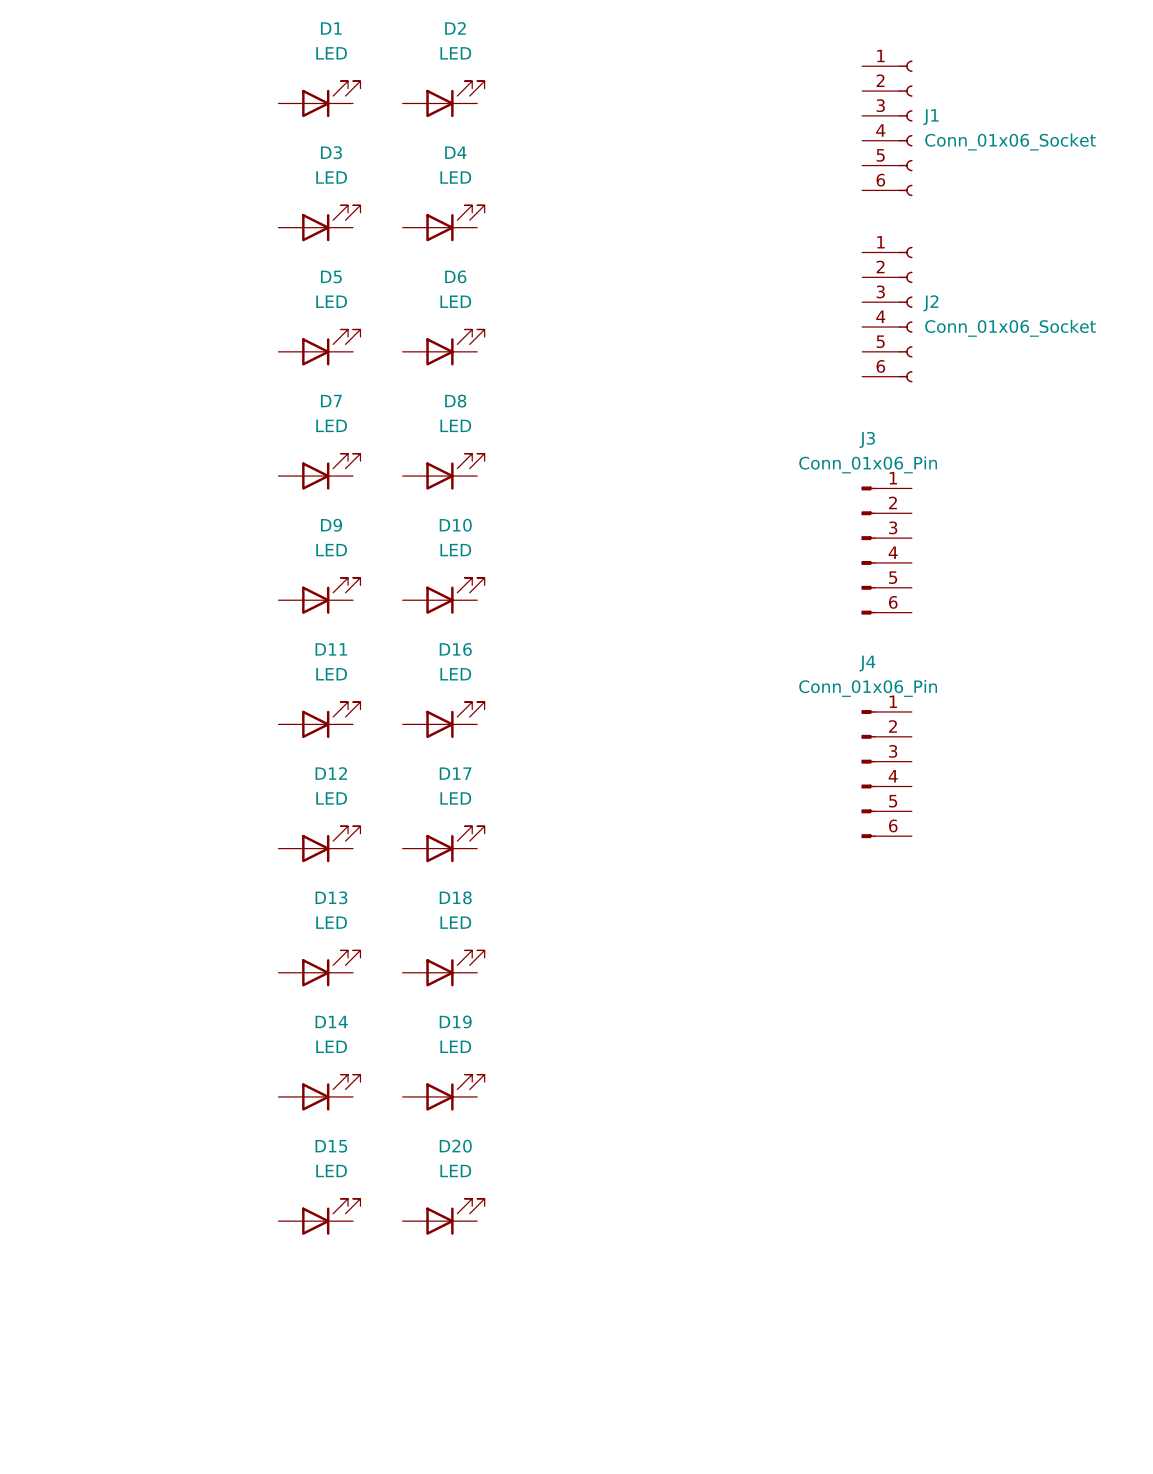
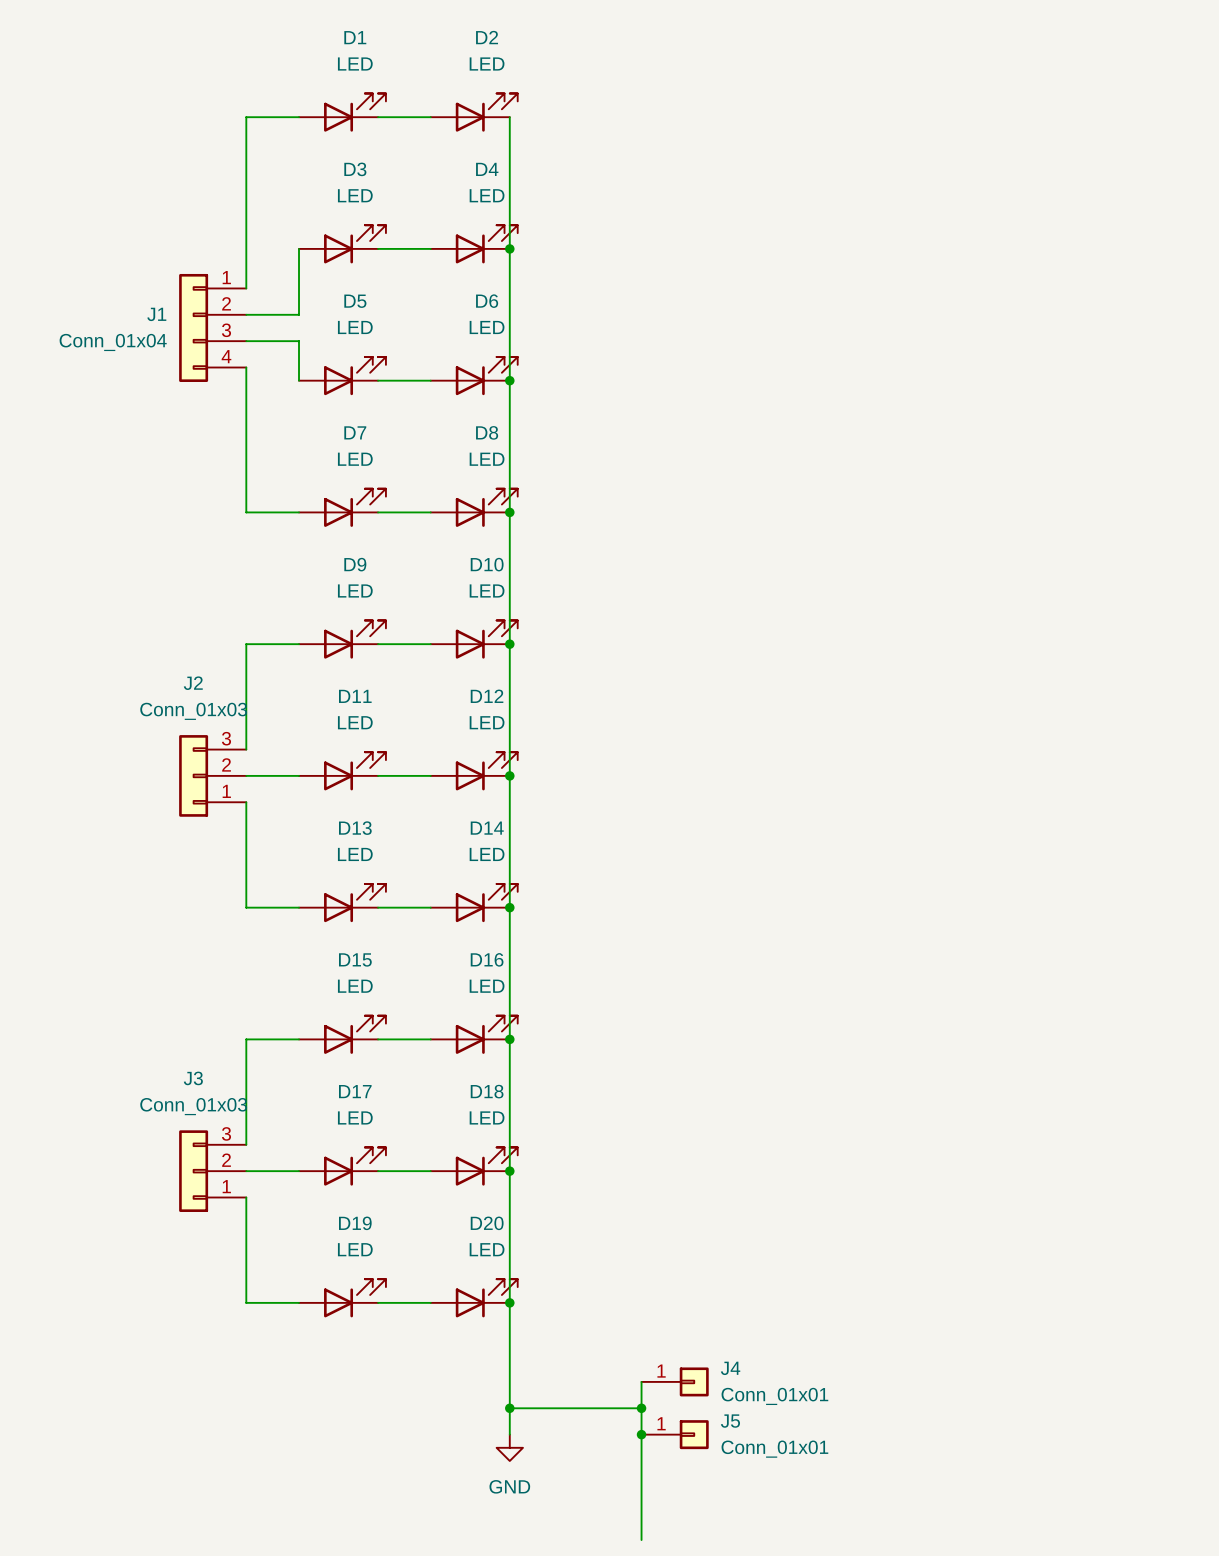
J1 symbol: [862, 60, 913, 197] -> [179, 273, 247, 383]
wire: none -> (299, 117) (246, 117) (246, 288)
wire: none -> (378, 117) (430, 117)
wire: none -> (509, 117) (509, 1434)
J1 name position: J1 (930, 117) -> J1 (156, 314)
J1 value: Conn_01x06_Socket (1010, 142) -> Conn_01x04 (113, 342)
wire: none -> (299, 248) (299, 314) (246, 314)
wire: none -> (378, 248) (430, 248)
junction: none -> (509, 248)
J2 symbol: [862, 246, 913, 383] -> [179, 735, 247, 817]
J2 name position: J2 (930, 303) -> J2 (193, 683)
wire: none -> (246, 341) (299, 341) (299, 380)
J2 value: Conn_01x06_Socket (1010, 328) -> Conn_01x03 (193, 711)
wire: none -> (246, 367) (246, 512) (299, 512)
wire: none -> (378, 380) (430, 380)
junction: none -> (509, 380)
J3 name position: J3 (867, 439) -> J3 (193, 1078)
J3 value: Conn_01x06_Pin (868, 464) -> Conn_01x03 (193, 1106)
wire: none -> (378, 512) (430, 512)
junction: none -> (509, 512)
J3 symbol: [861, 486, 912, 615] -> [179, 1130, 247, 1212]
wire: none -> (299, 644) (246, 644) (246, 749)
wire: none -> (378, 644) (430, 644)
junction: none -> (509, 644)
D16 name: D16 (455, 649) -> D12 (487, 696)
J4 name position: J4 (867, 663) -> J4 (730, 1368)
J4 value: Conn_01x06_Pin (868, 688) -> Conn_01x01 (774, 1396)
J4 symbol: [861, 710, 912, 839] -> [641, 1367, 709, 1397]
wire: none -> (246, 775) (299, 775)
wire: none -> (378, 775) (430, 775)
junction: none -> (509, 775)
wire: none -> (246, 802) (246, 907) (299, 907)
D12 name: D12 (331, 773) -> D13 (355, 828)
D17 name: D17 (455, 773) -> D14 (487, 828)
wire: none -> (378, 907) (430, 907)
junction: none -> (509, 907)
D13 name: D13 (331, 897) -> D15 (355, 959)
D18 name: D18 (455, 897) -> D16 (487, 959)
wire: none -> (299, 1039) (246, 1039) (246, 1144)
wire: none -> (378, 1039) (430, 1039)
junction: none -> (509, 1039)
D14 name: D14 (331, 1021) -> D17 (355, 1091)
D19 name: D19 (455, 1021) -> D18 (487, 1091)
wire: none -> (246, 1171) (299, 1171)
wire: none -> (378, 1171) (430, 1171)
junction: none -> (509, 1171)
wire: none -> (246, 1197) (246, 1302) (299, 1302)
D15 name: D15 (331, 1146) -> D19 (355, 1223)
wire: none -> (378, 1302) (430, 1302)
junction: none -> (509, 1302)
wire: none -> (641, 1381) (641, 1540)
wire: none -> (509, 1408) (641, 1408)
junction: none -> (509, 1408)
junction: none -> (641, 1408)
junction: none -> (641, 1434)
J5: none -> Conn_01x01 (675, 1434)
power symbol: none -> GND (509, 1447)

